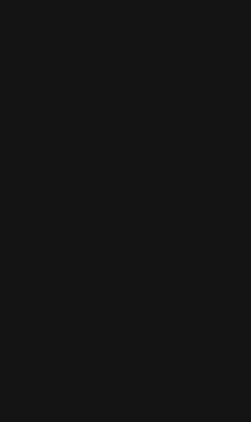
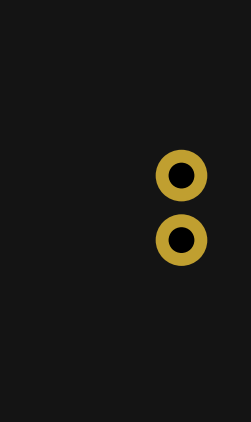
via: none -> (181, 175)
via: none -> (181, 240)

